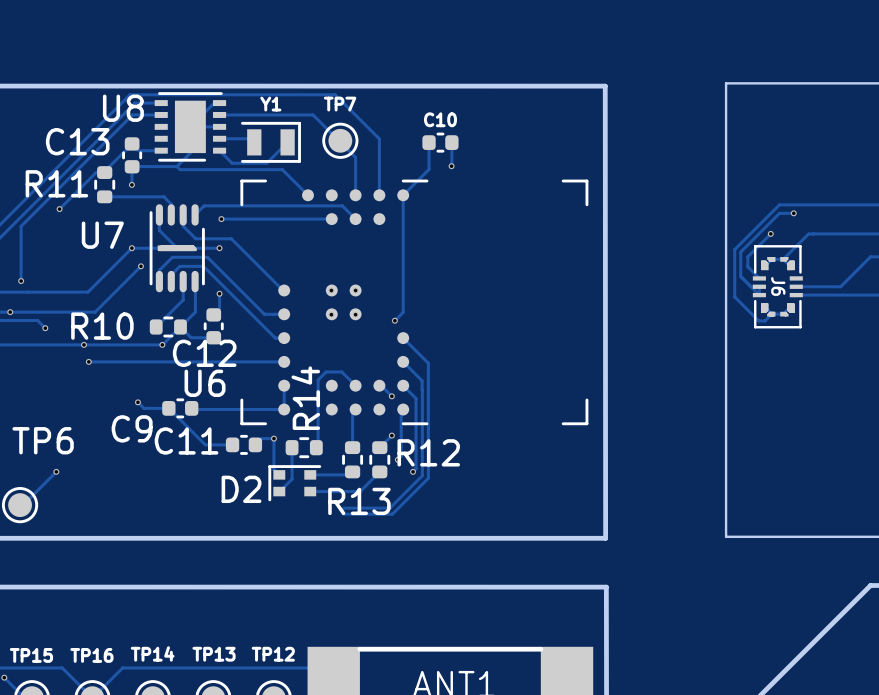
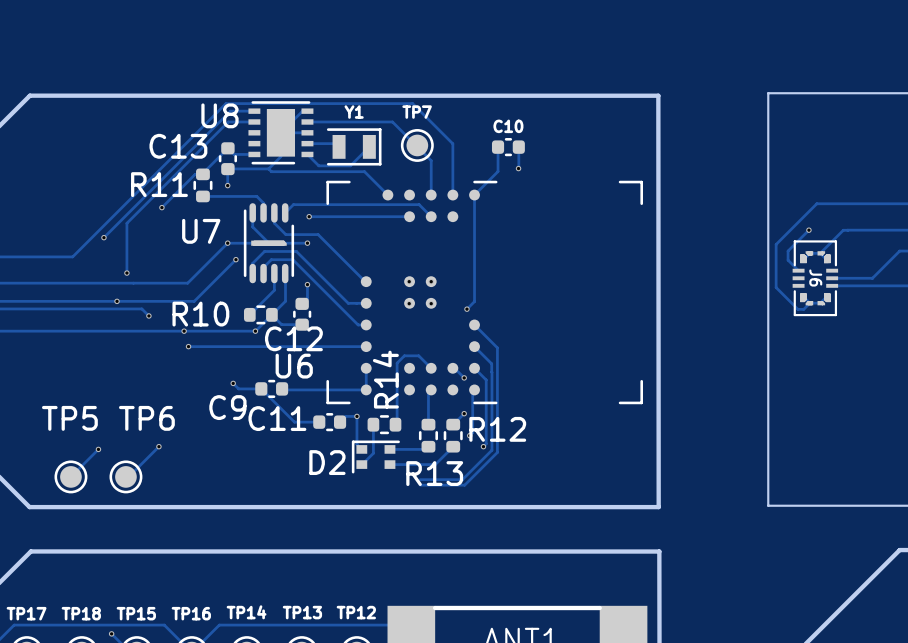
track: (793, 213) (779, 213) (740, 252) (740, 276) (759, 295) (759, 286) (751, 286) -> none
via: (793, 213) -> none

